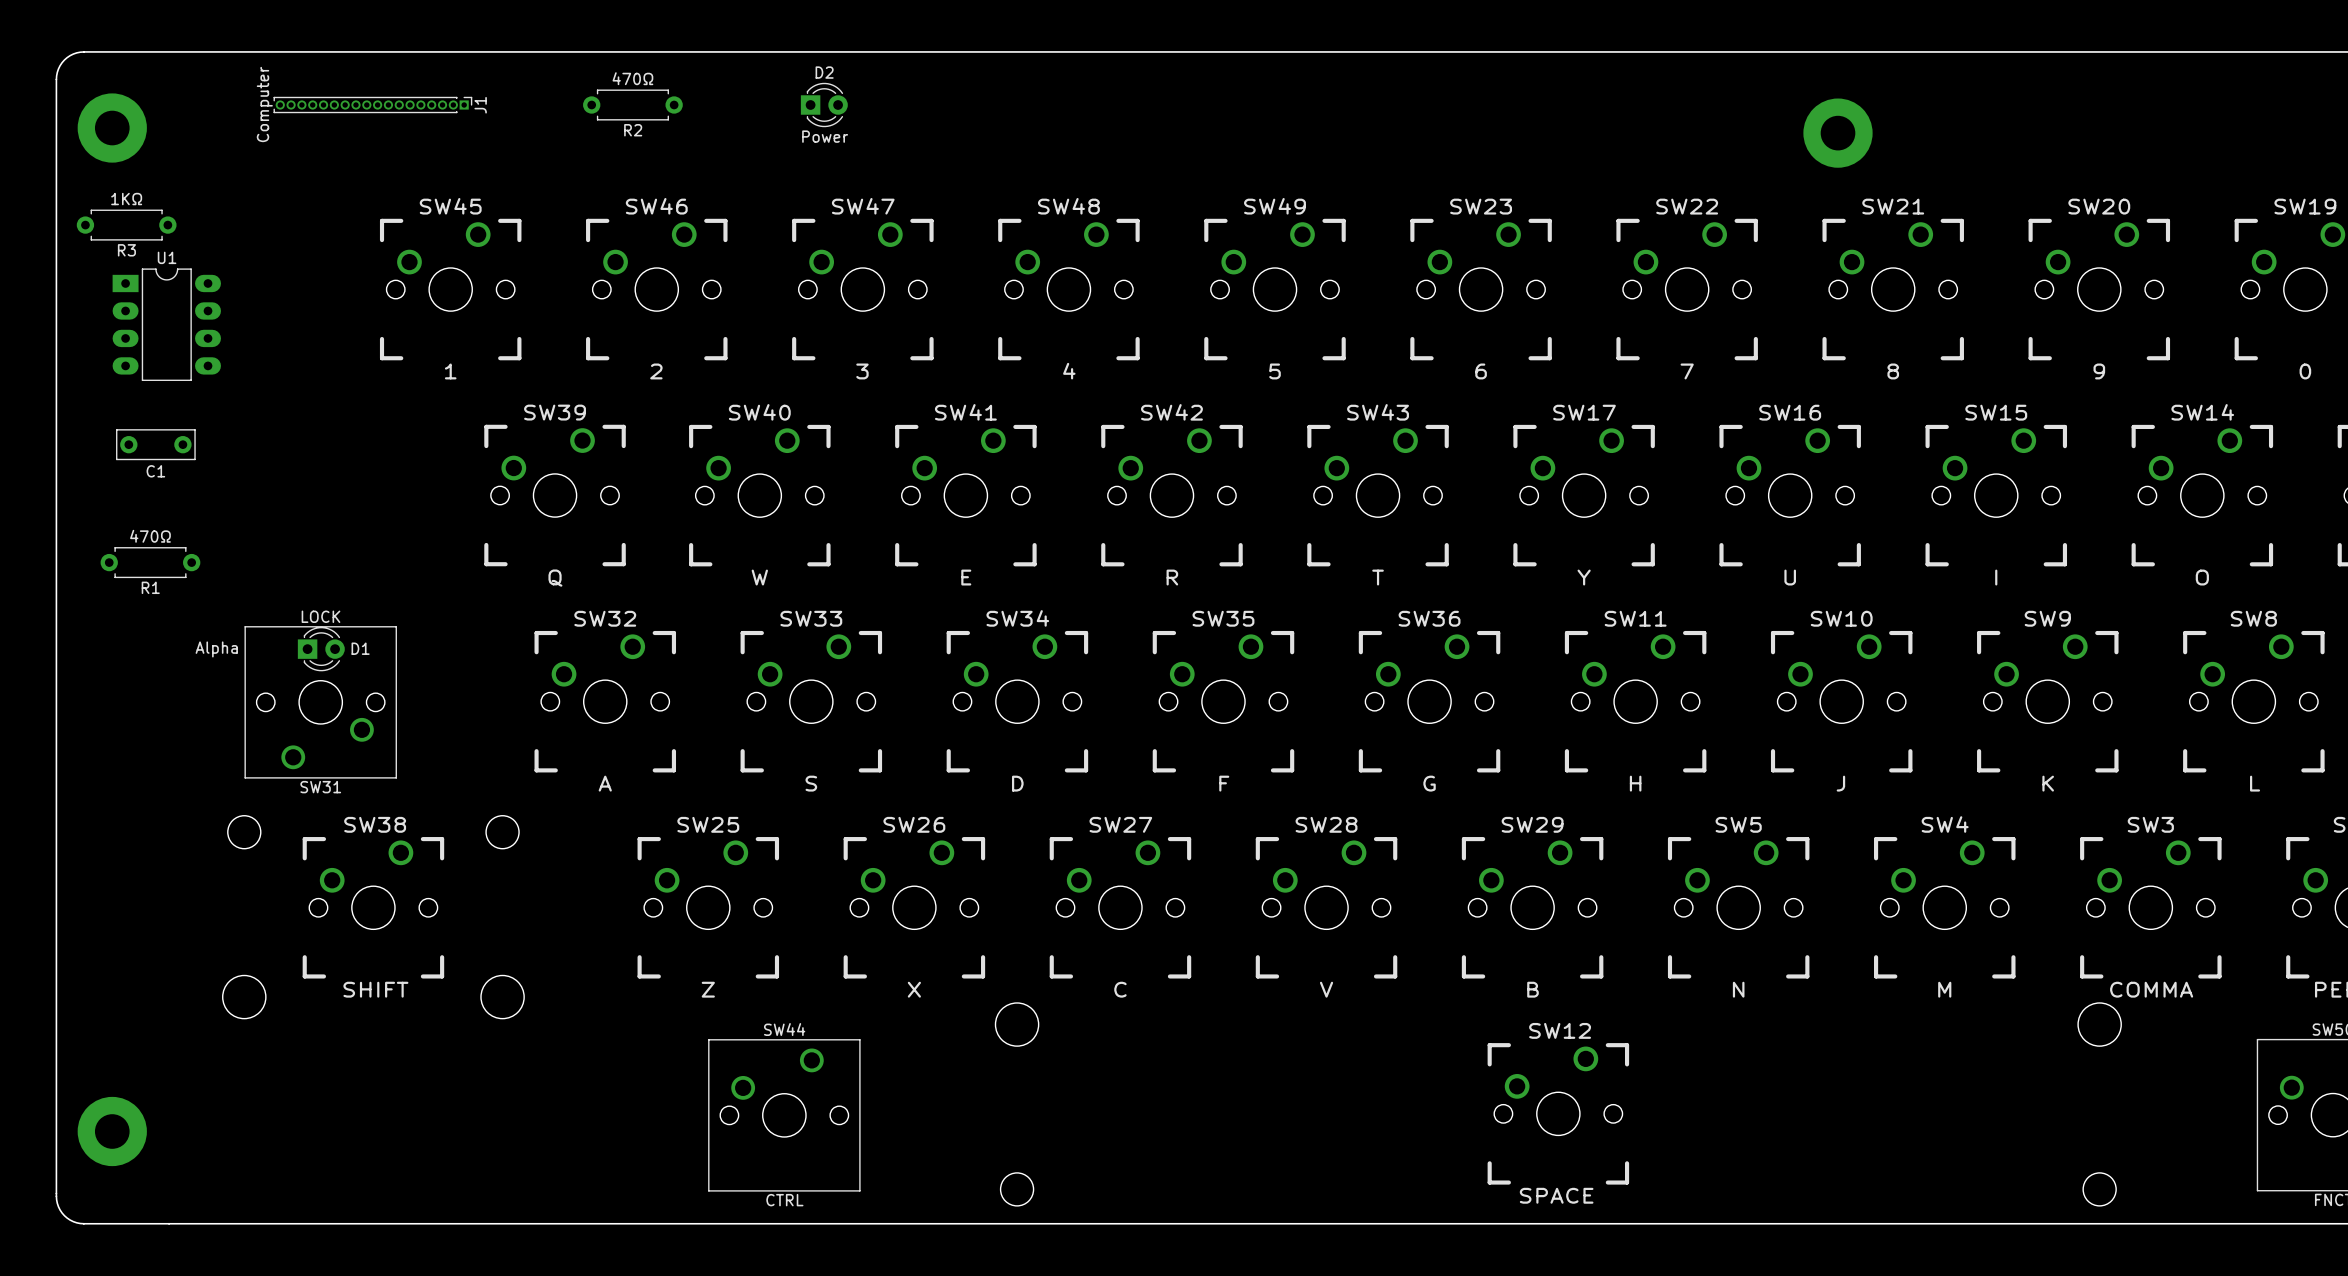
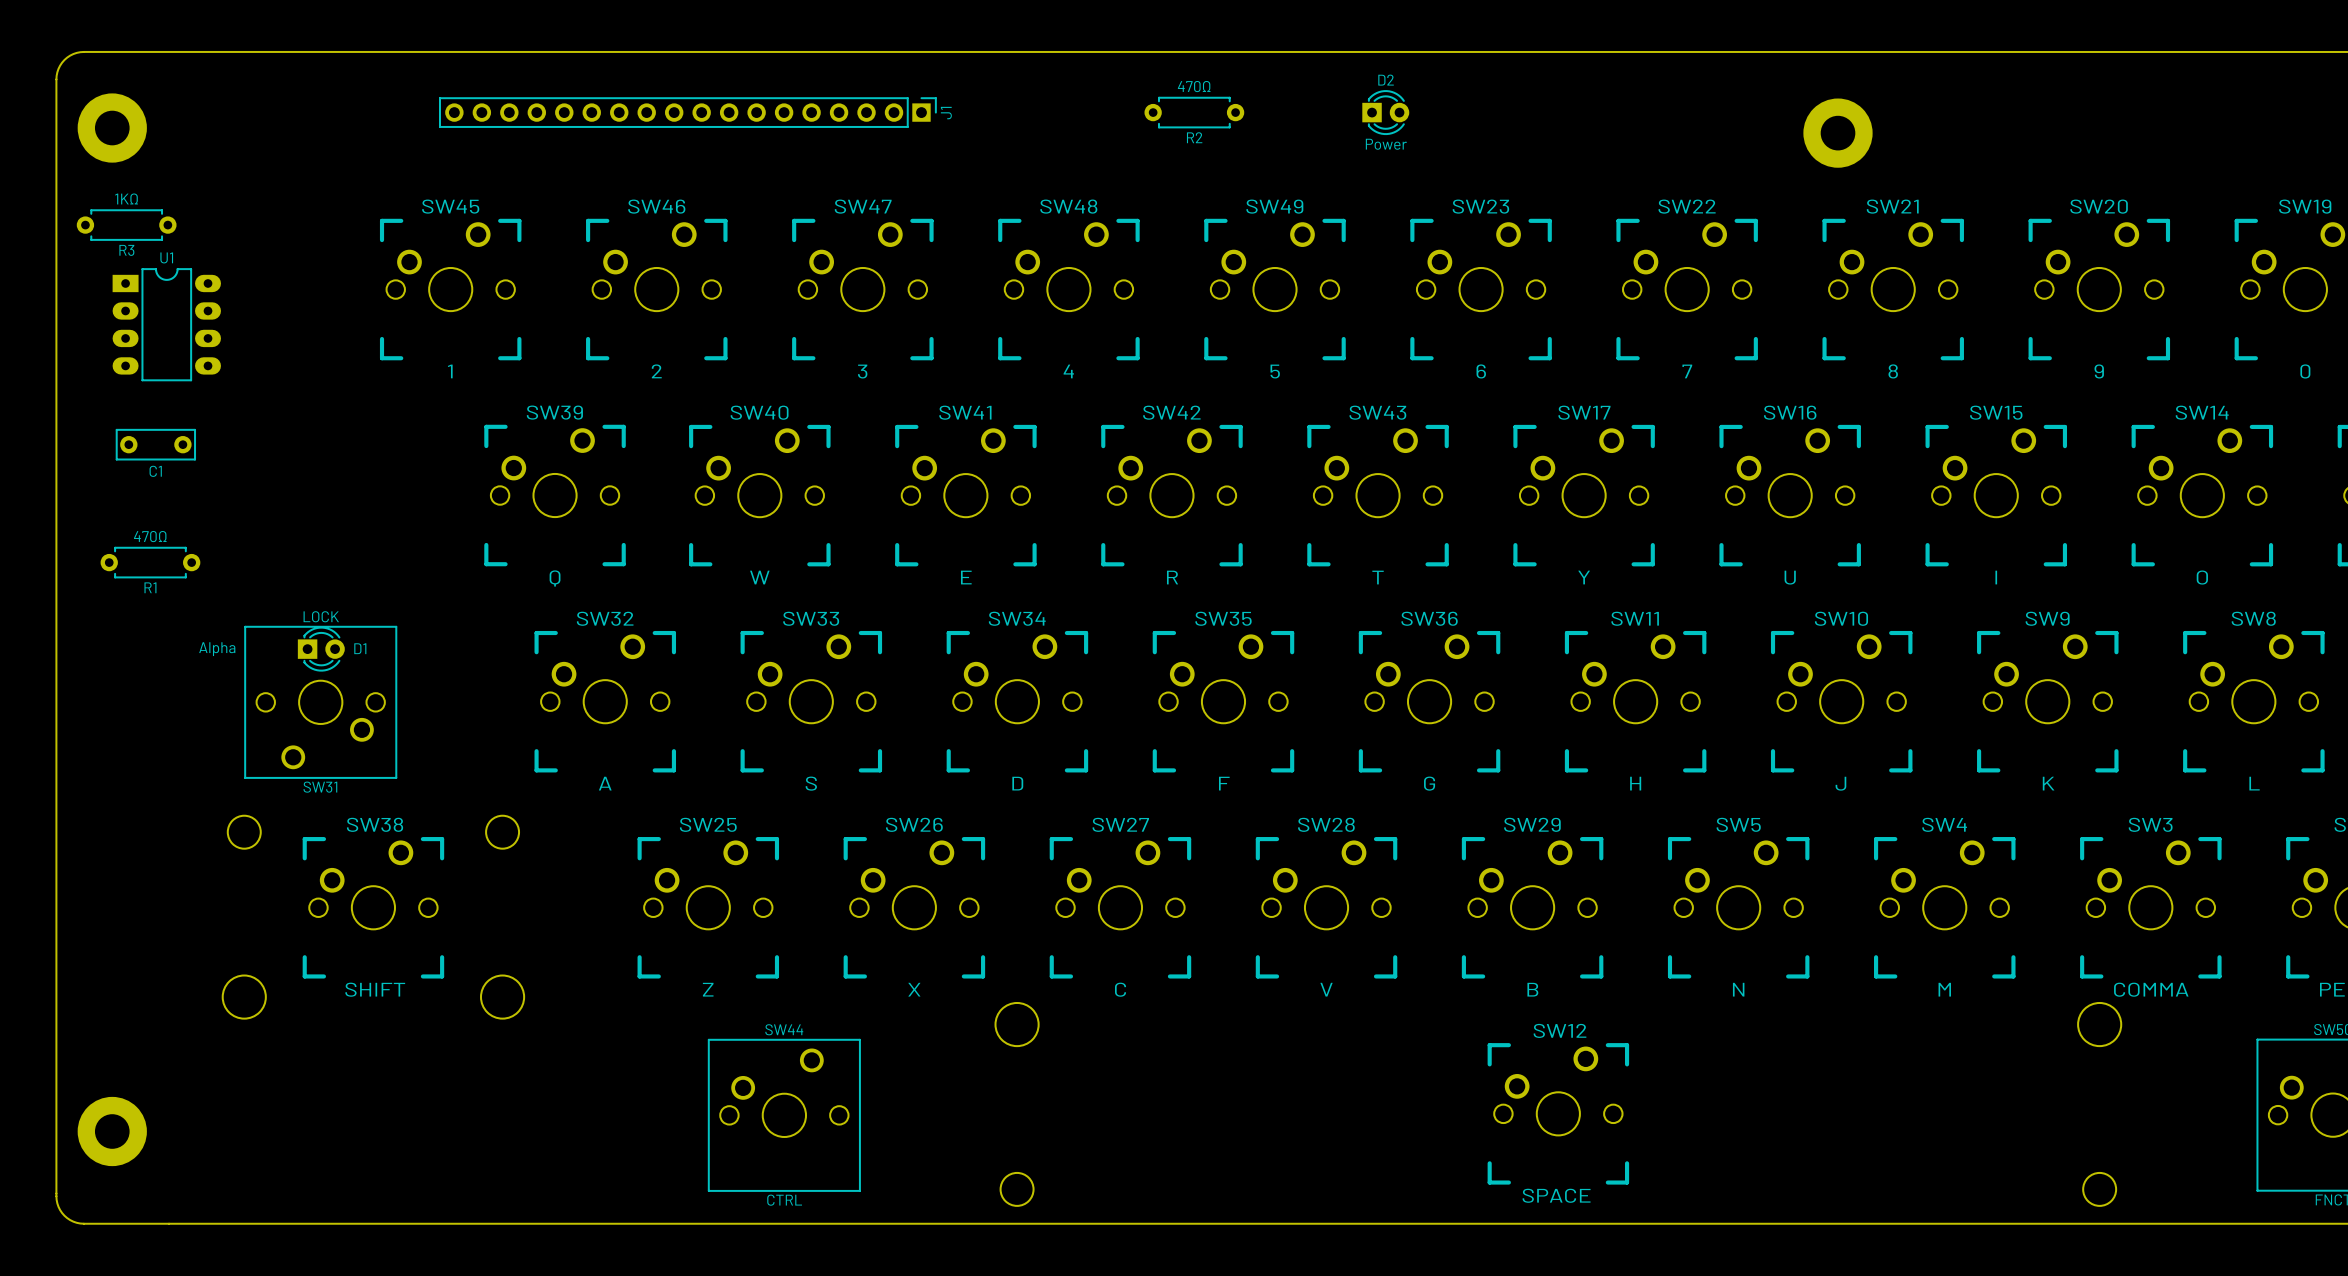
J1 footprint: [273, 96, 473, 114] -> [439, 97, 937, 128]
J1 value: Computer (264, 104) -> none
J1 name position: J1 (480, 105) -> J1 (946, 113)
R2 position: (632, 105) -> (1194, 112)
D2 position: (824, 105) -> (1385, 112)

